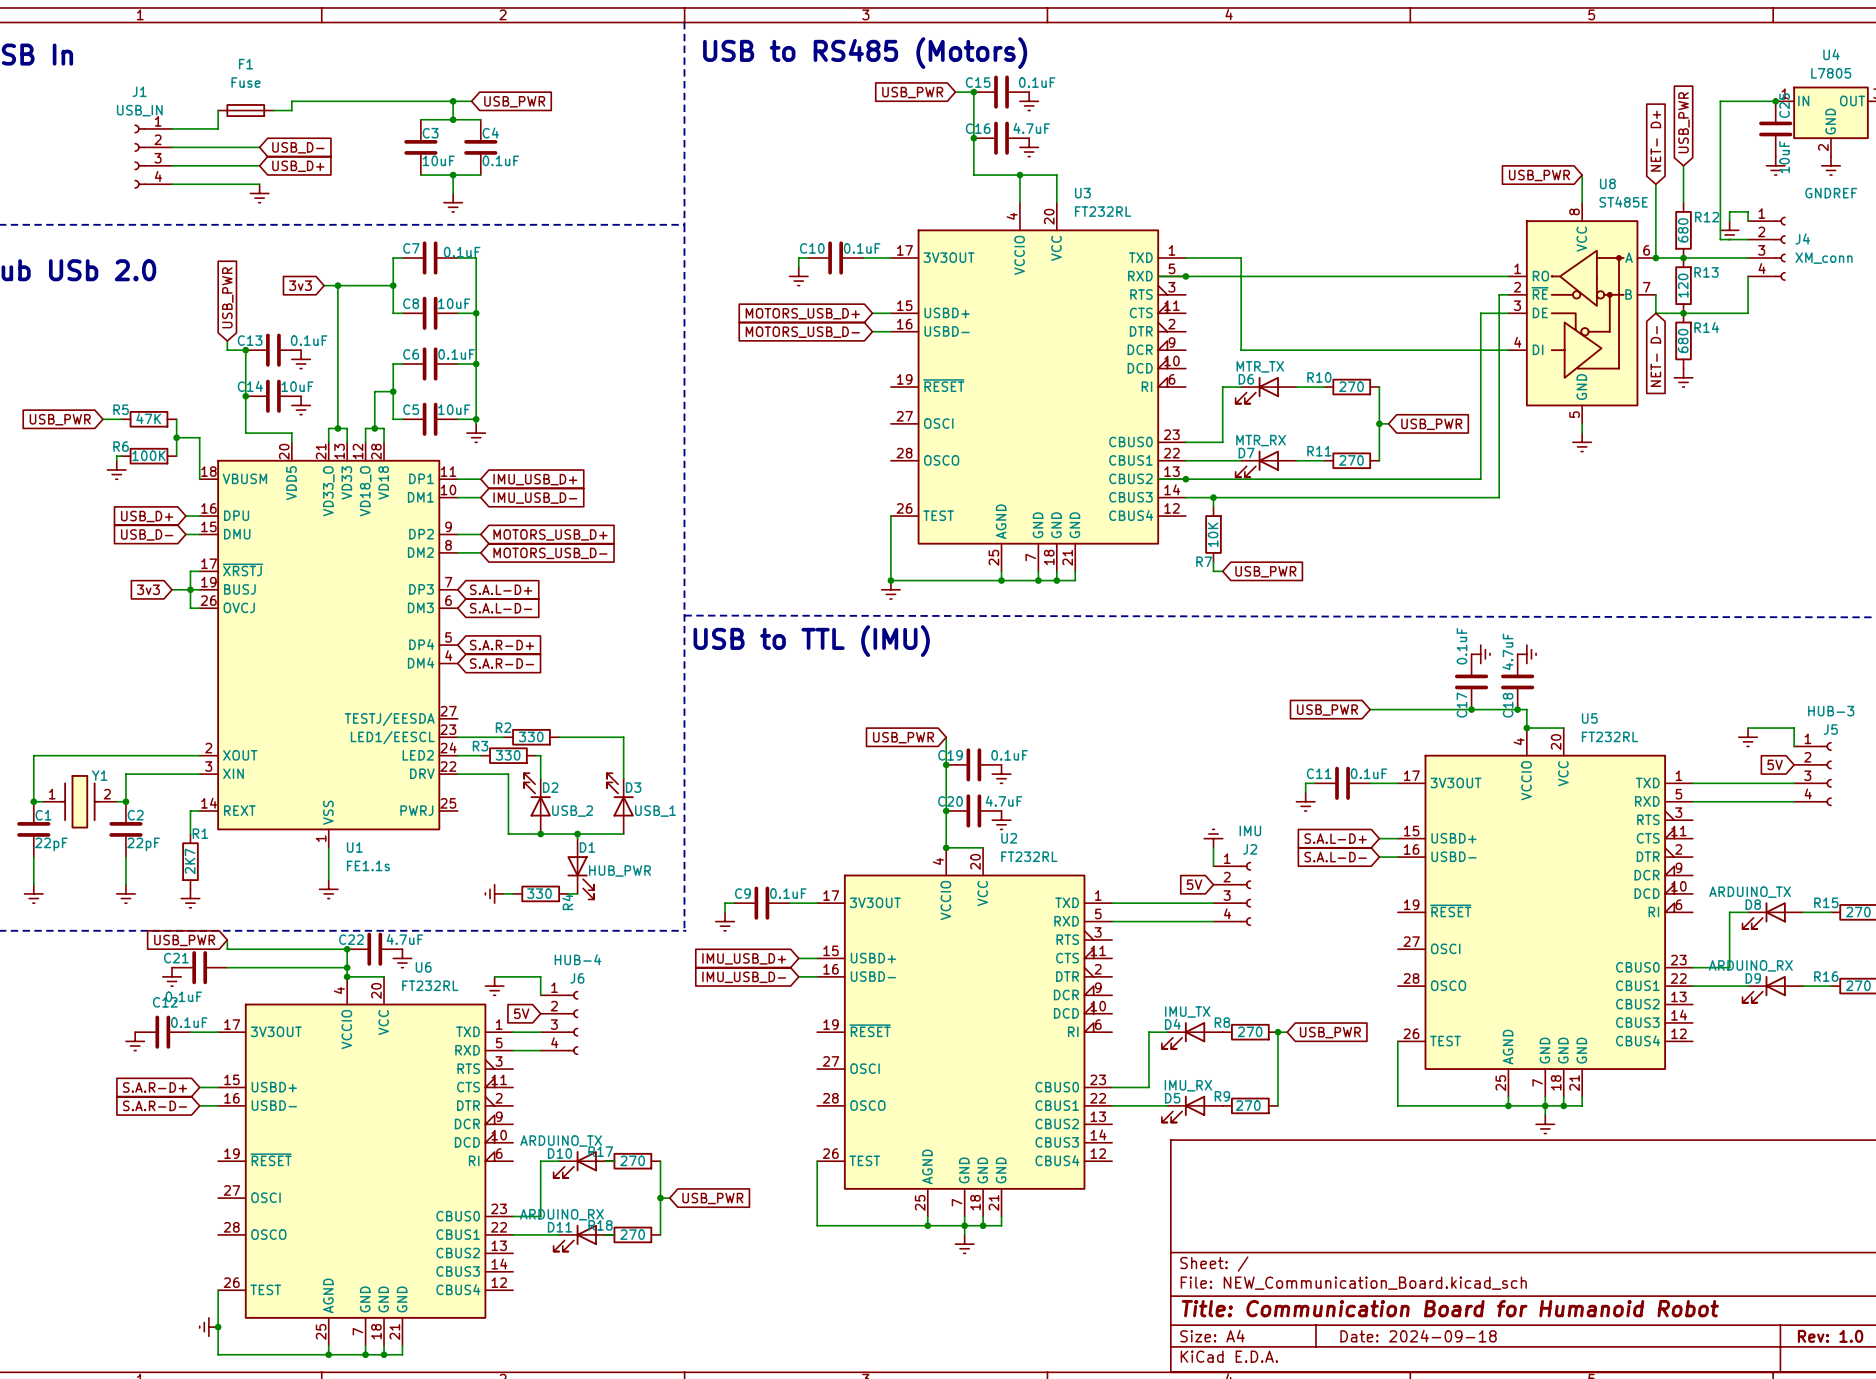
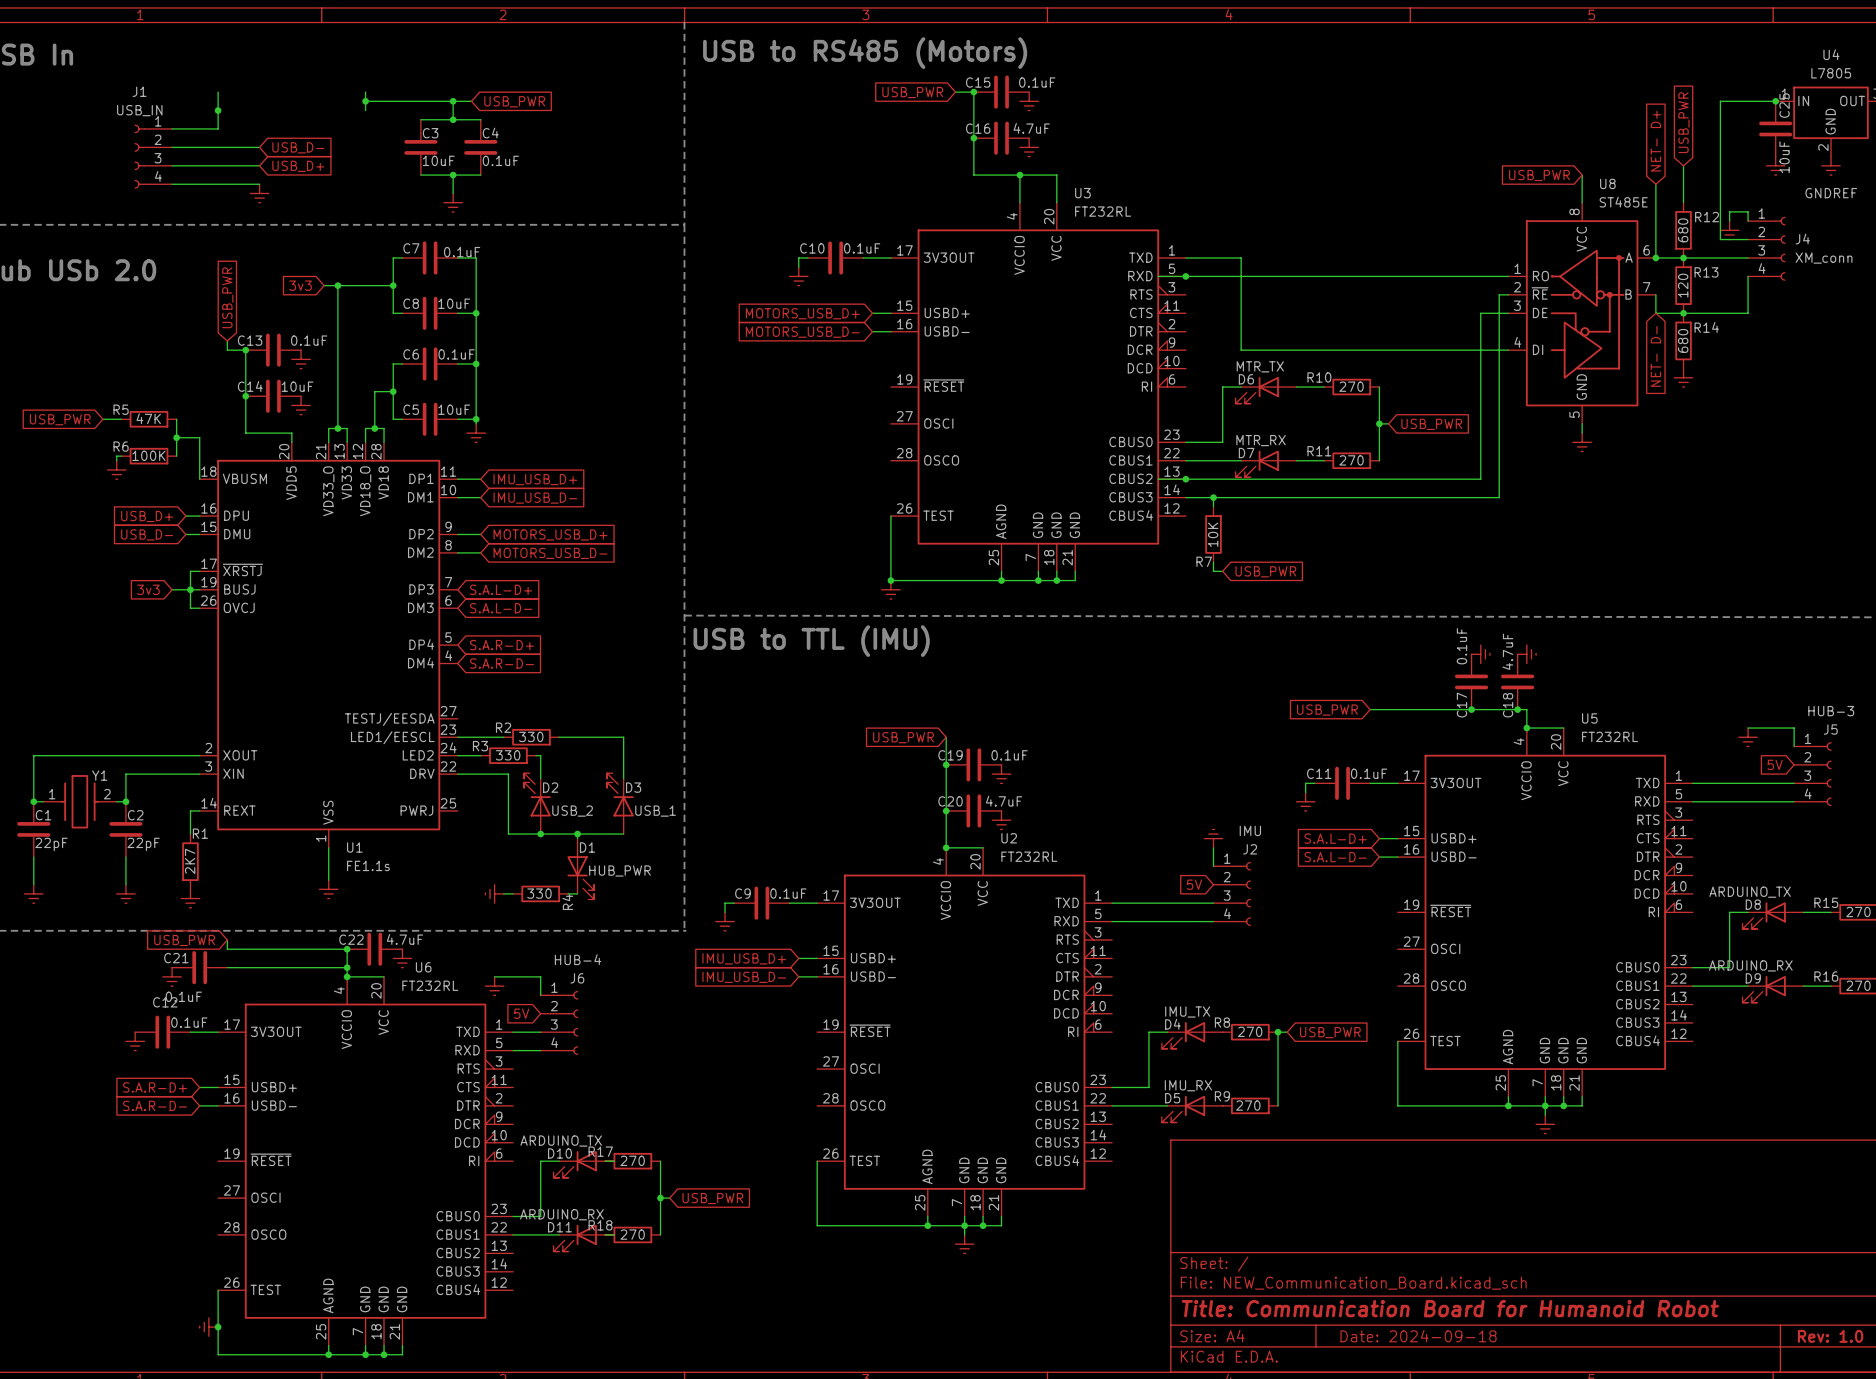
wire: none -> (218, 92) (218, 110)
wire: none -> (365, 92) (365, 110)
wire: (365, 101) (291, 101) (291, 110) (273, 110) -> none
junction: none -> (365, 101)
junction: none -> (218, 110)
F1: Fuse (245, 110) -> none

